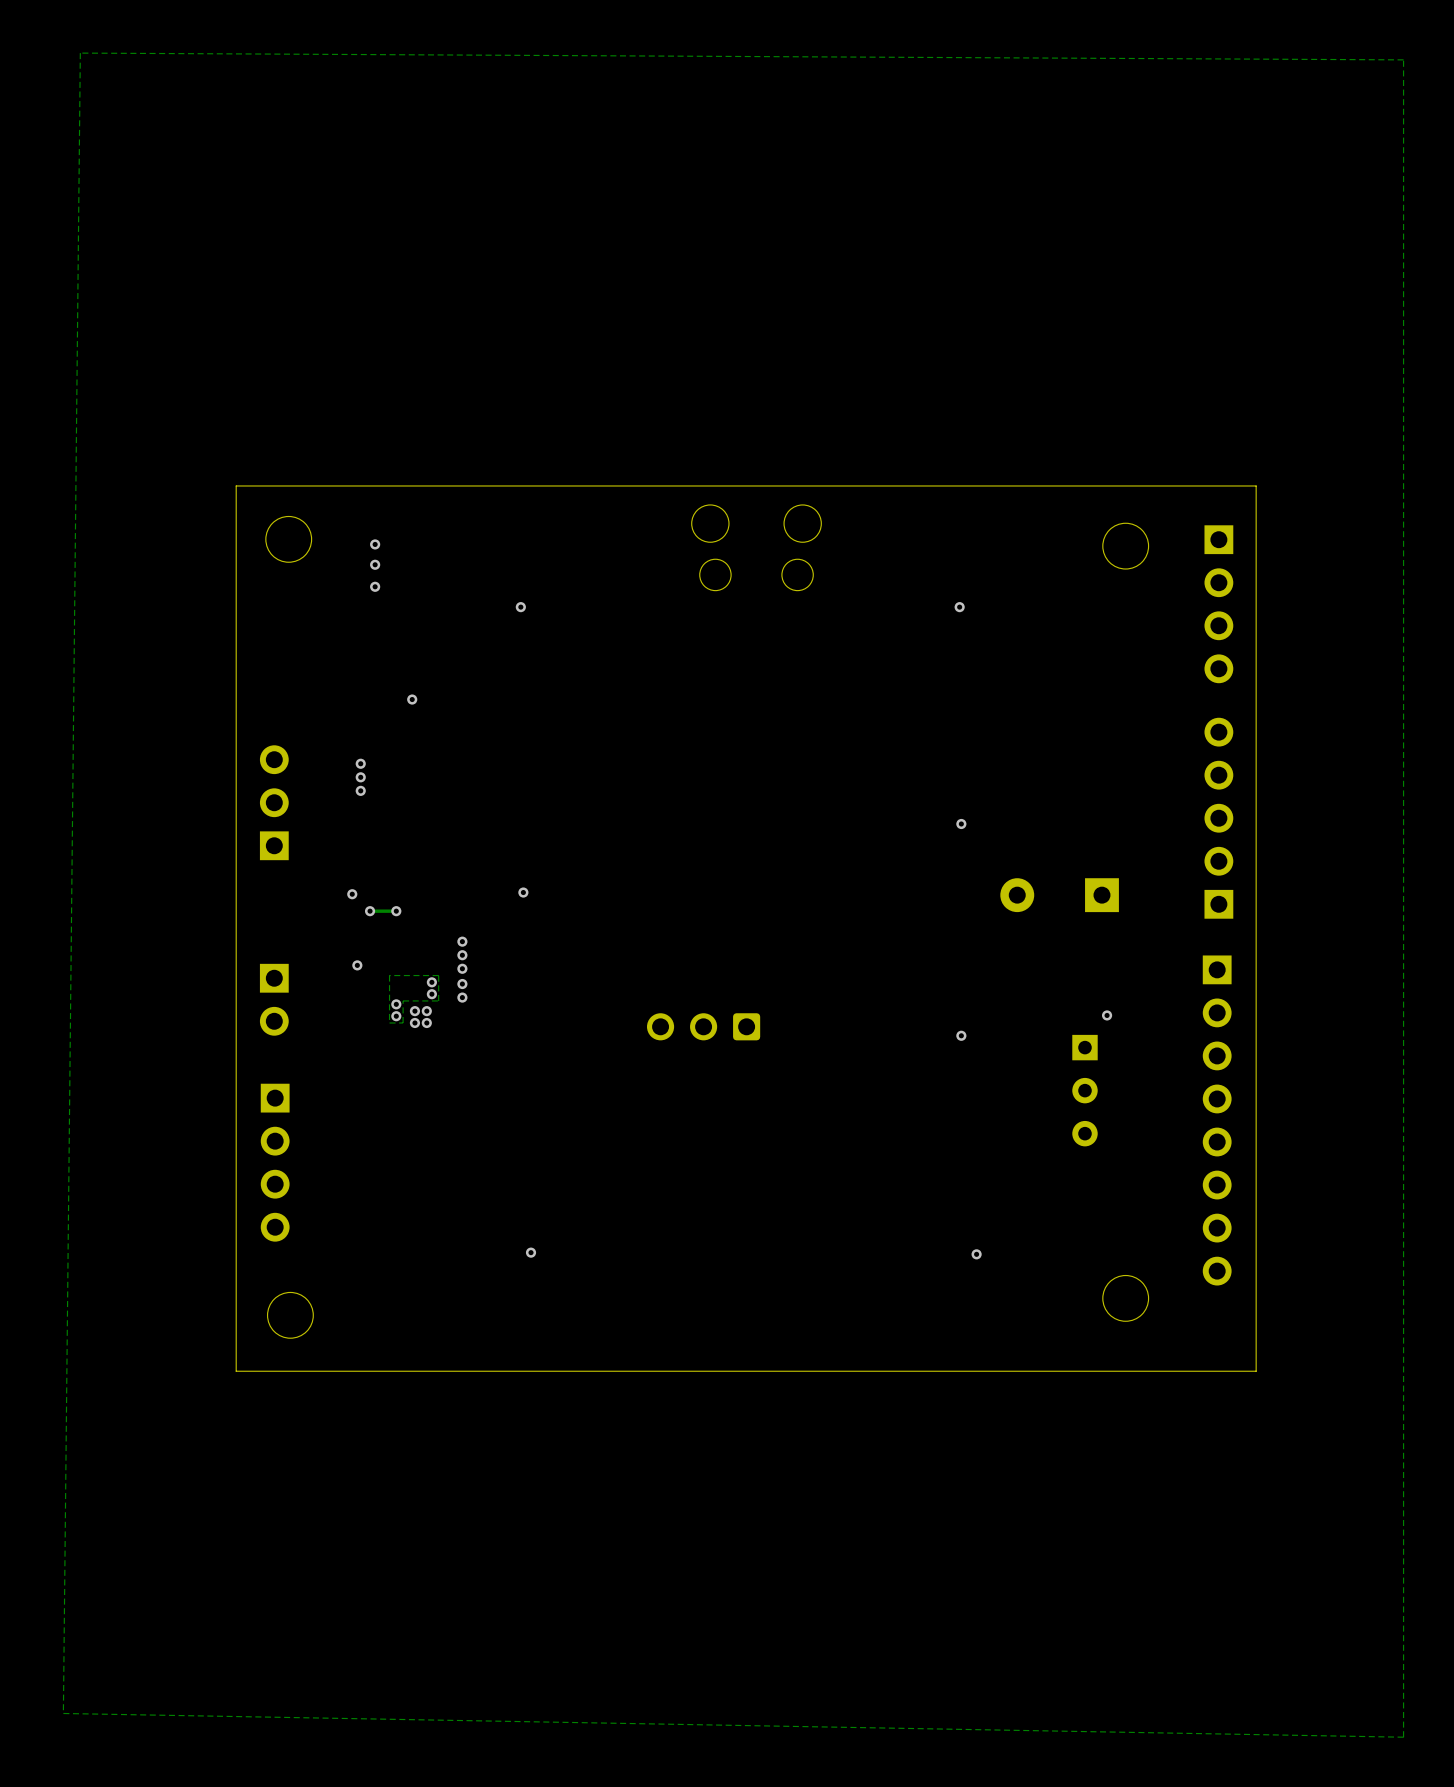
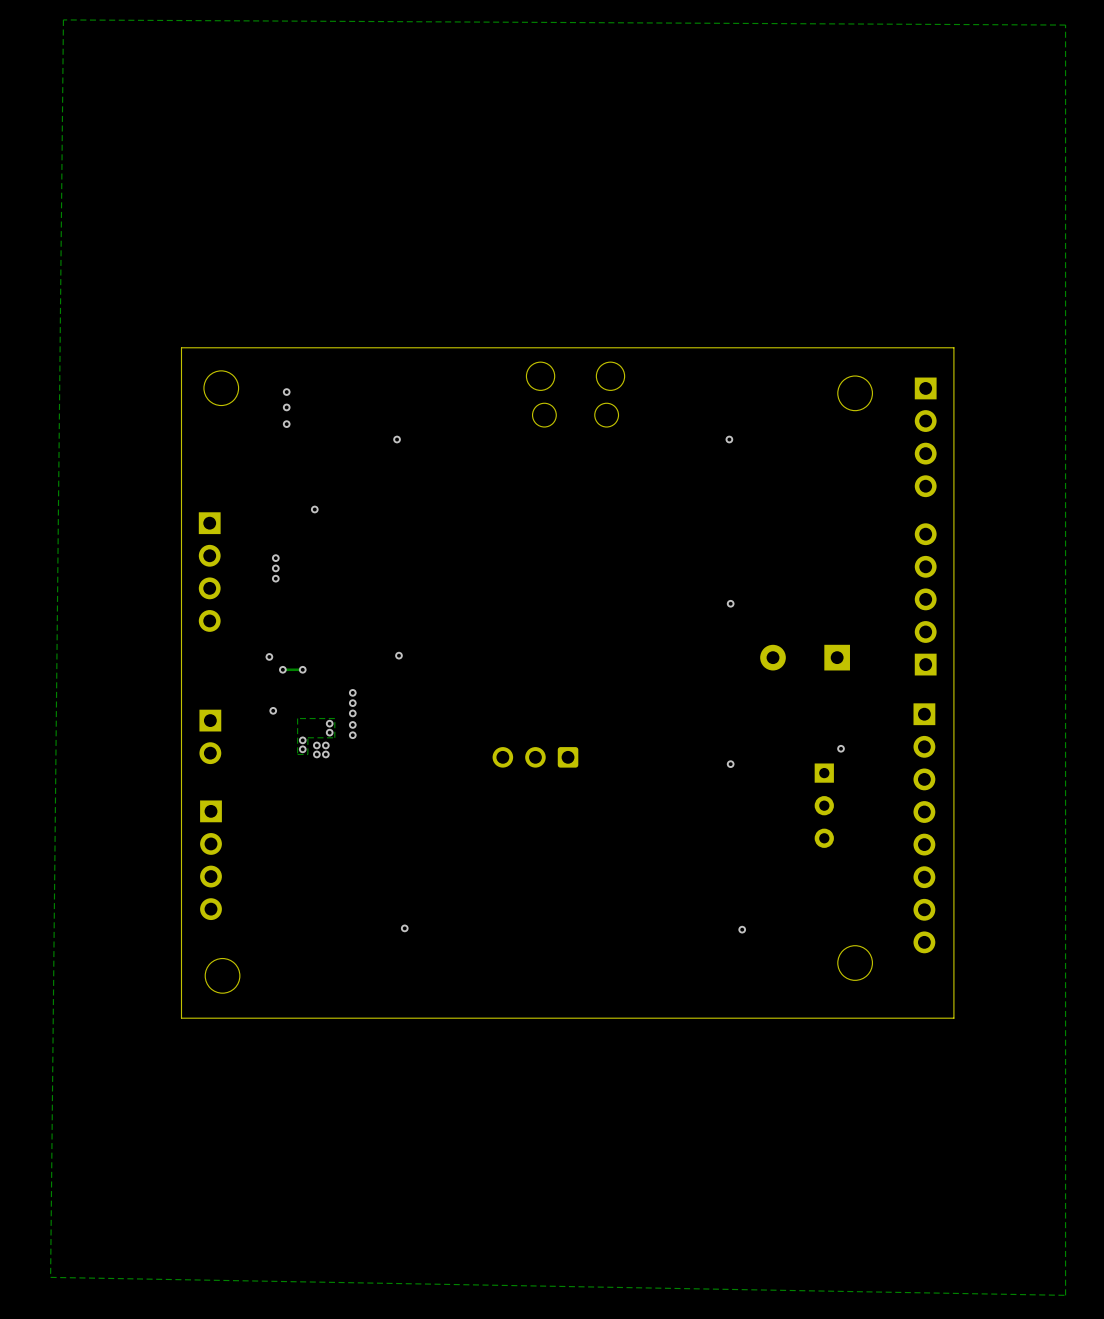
part: none -> (209, 572)
part: (274, 802) -> none

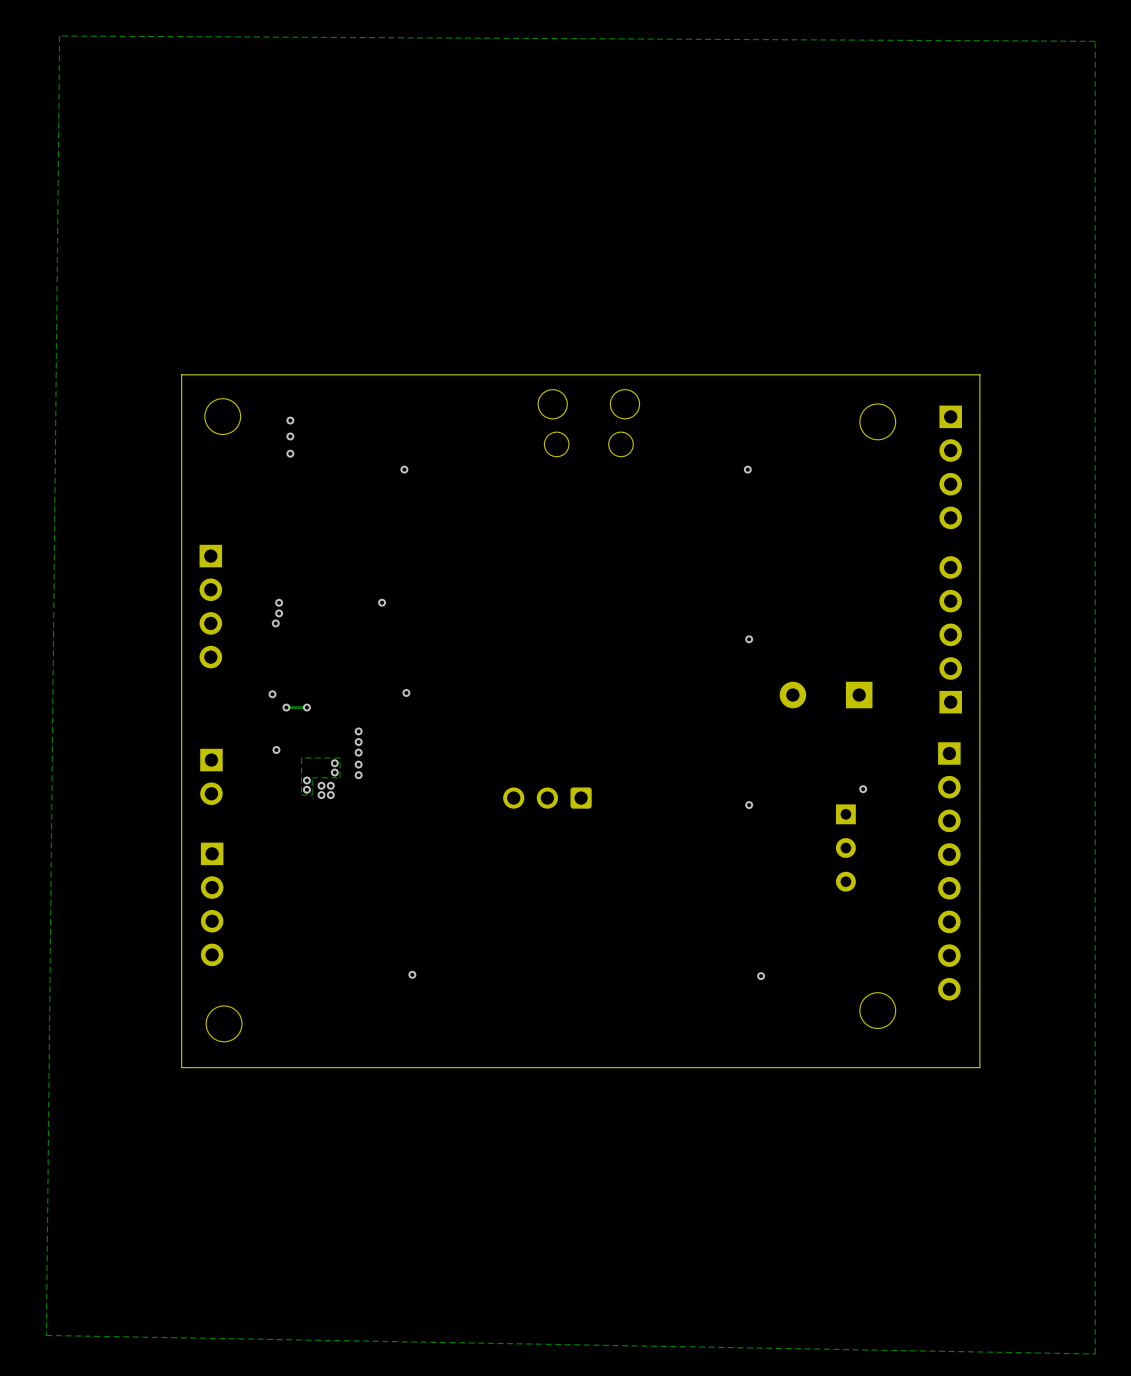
via: (314, 509) -> none
via position: (275, 558) -> (275, 623)
via: none -> (382, 602)

